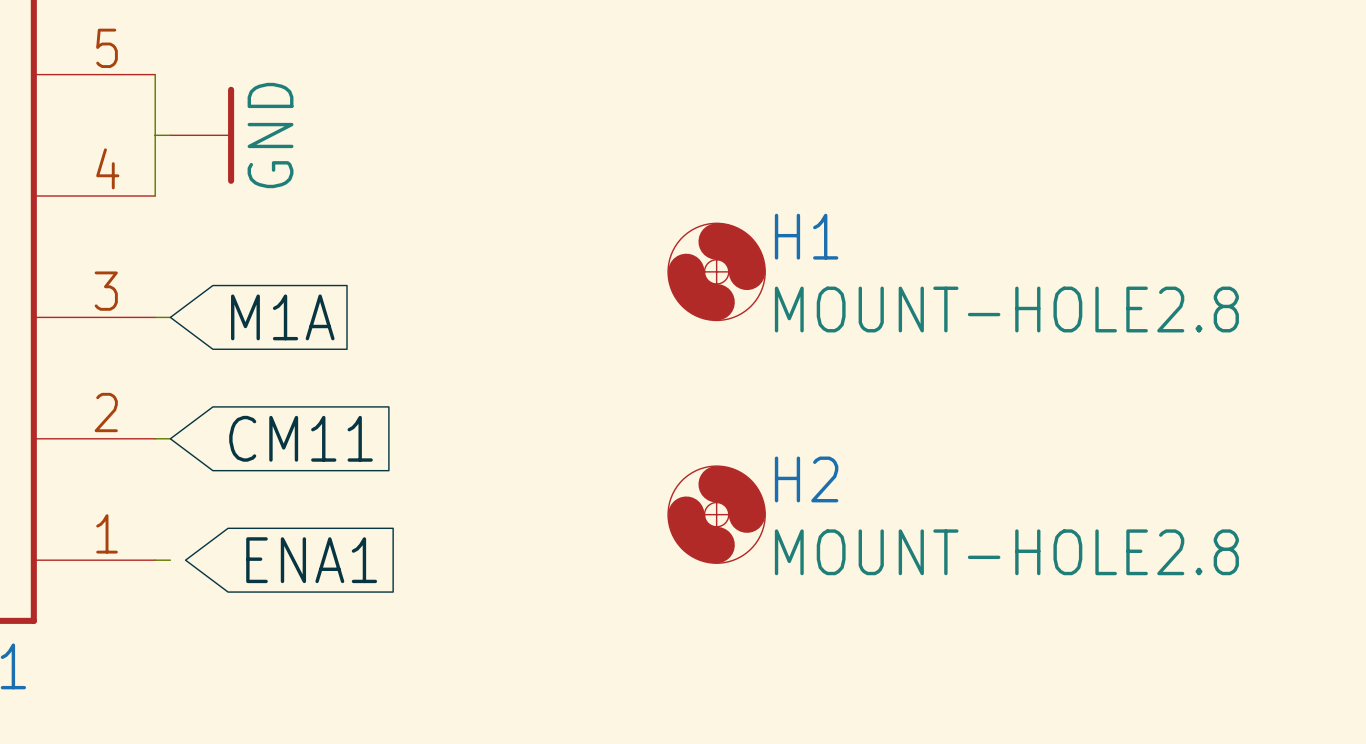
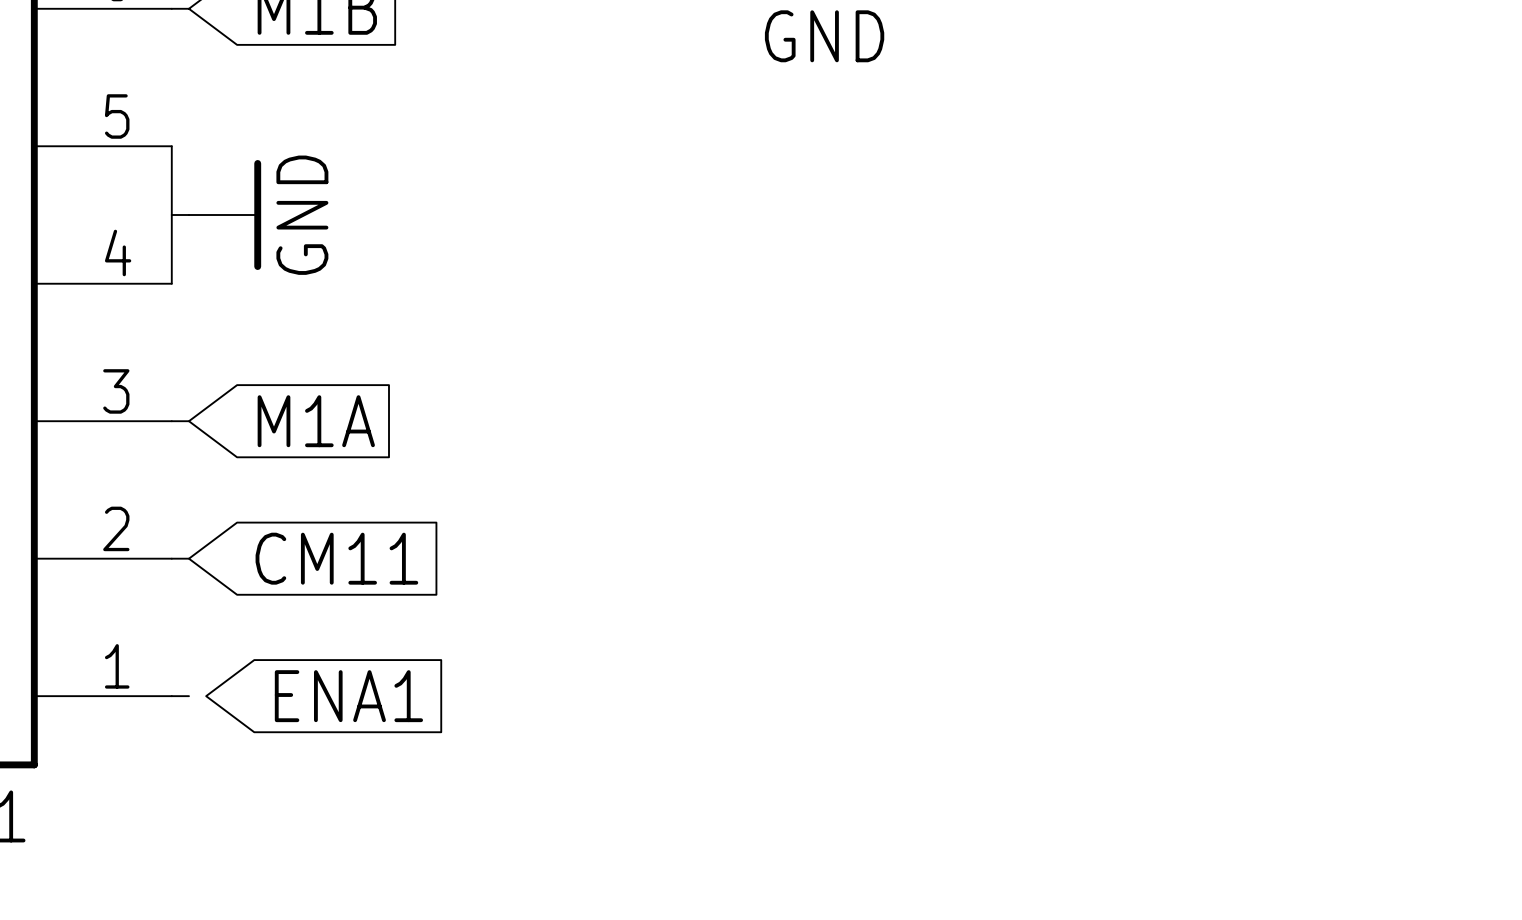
H1: MOUNT-HOLE2.8 (716, 271) -> none
H2: MOUNT-HOLE2.8 (716, 514) -> none

